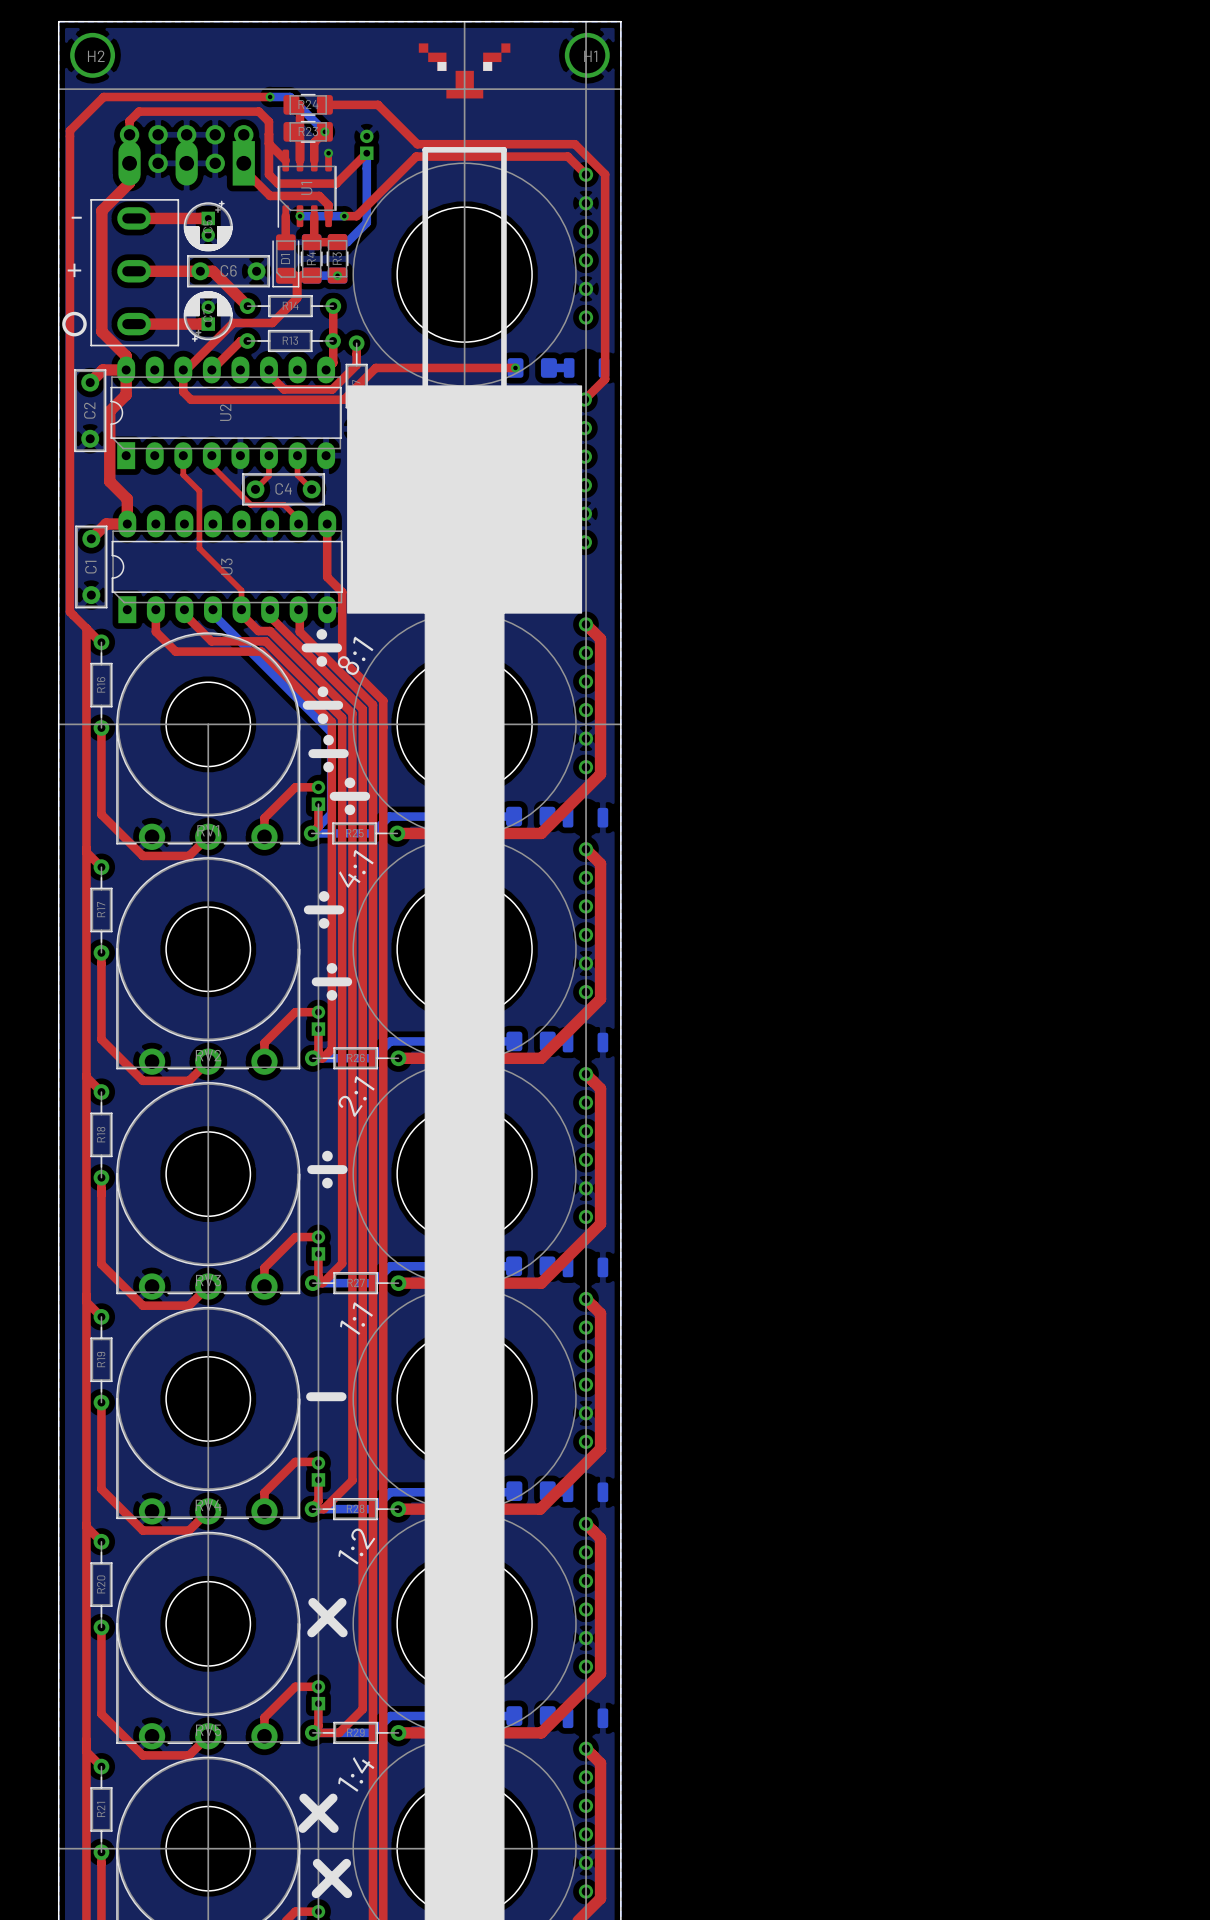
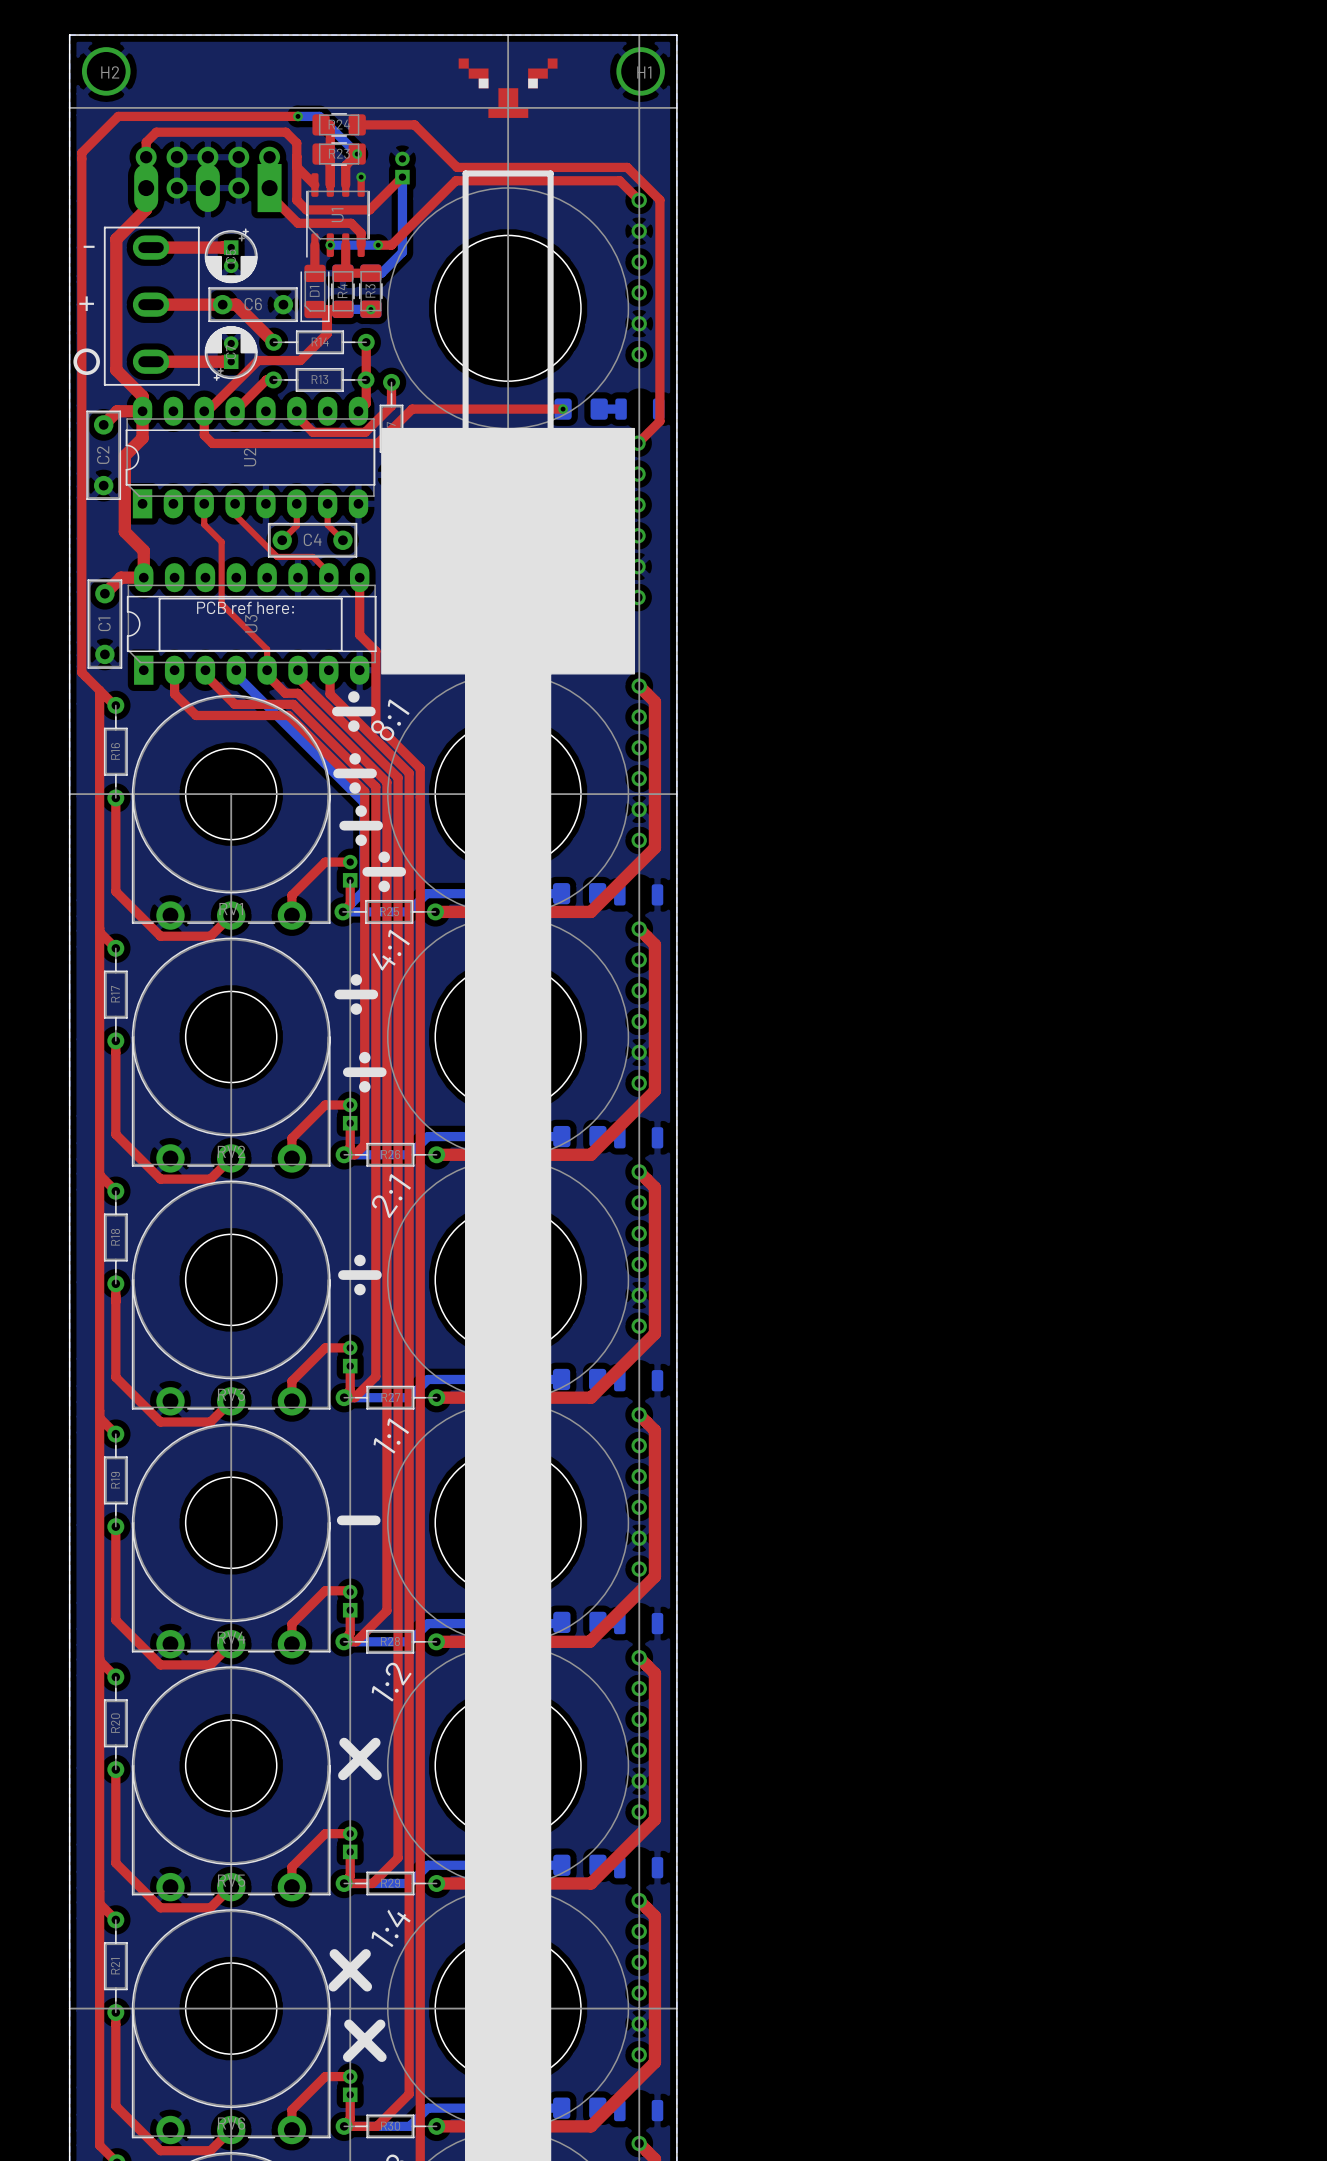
line: none -> (159, 598) (159, 650) (341, 650) (341, 598) (159, 598)
text: none -> PCB ref here: (245, 607)

